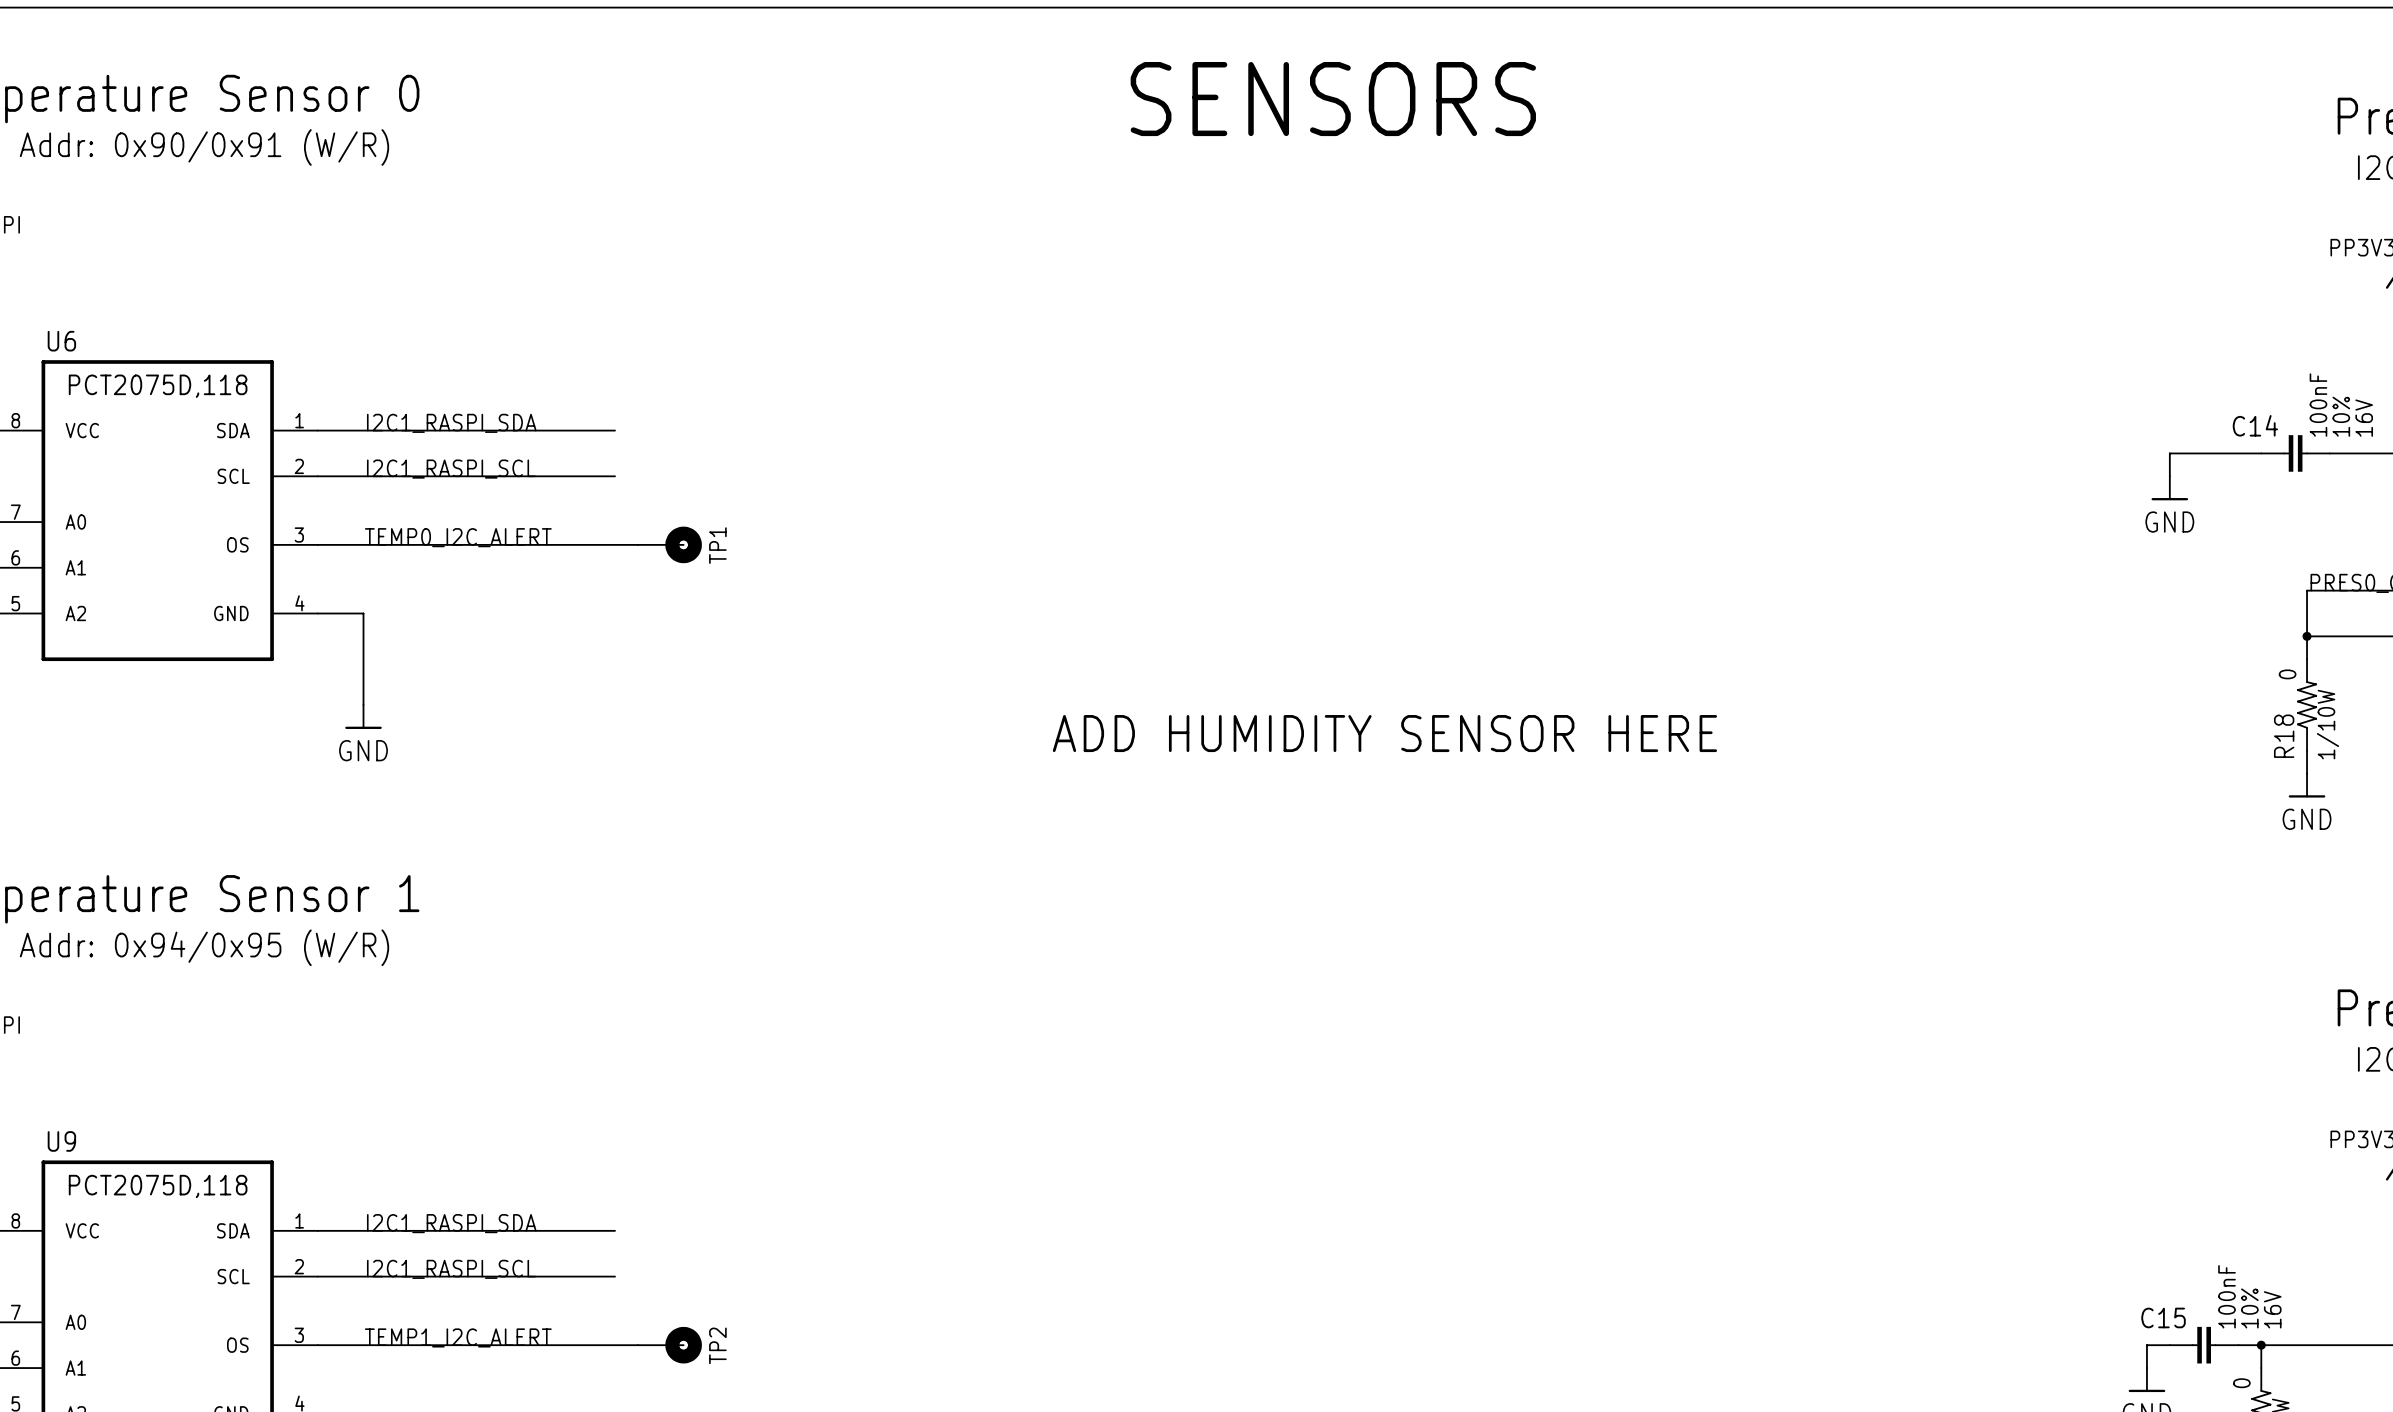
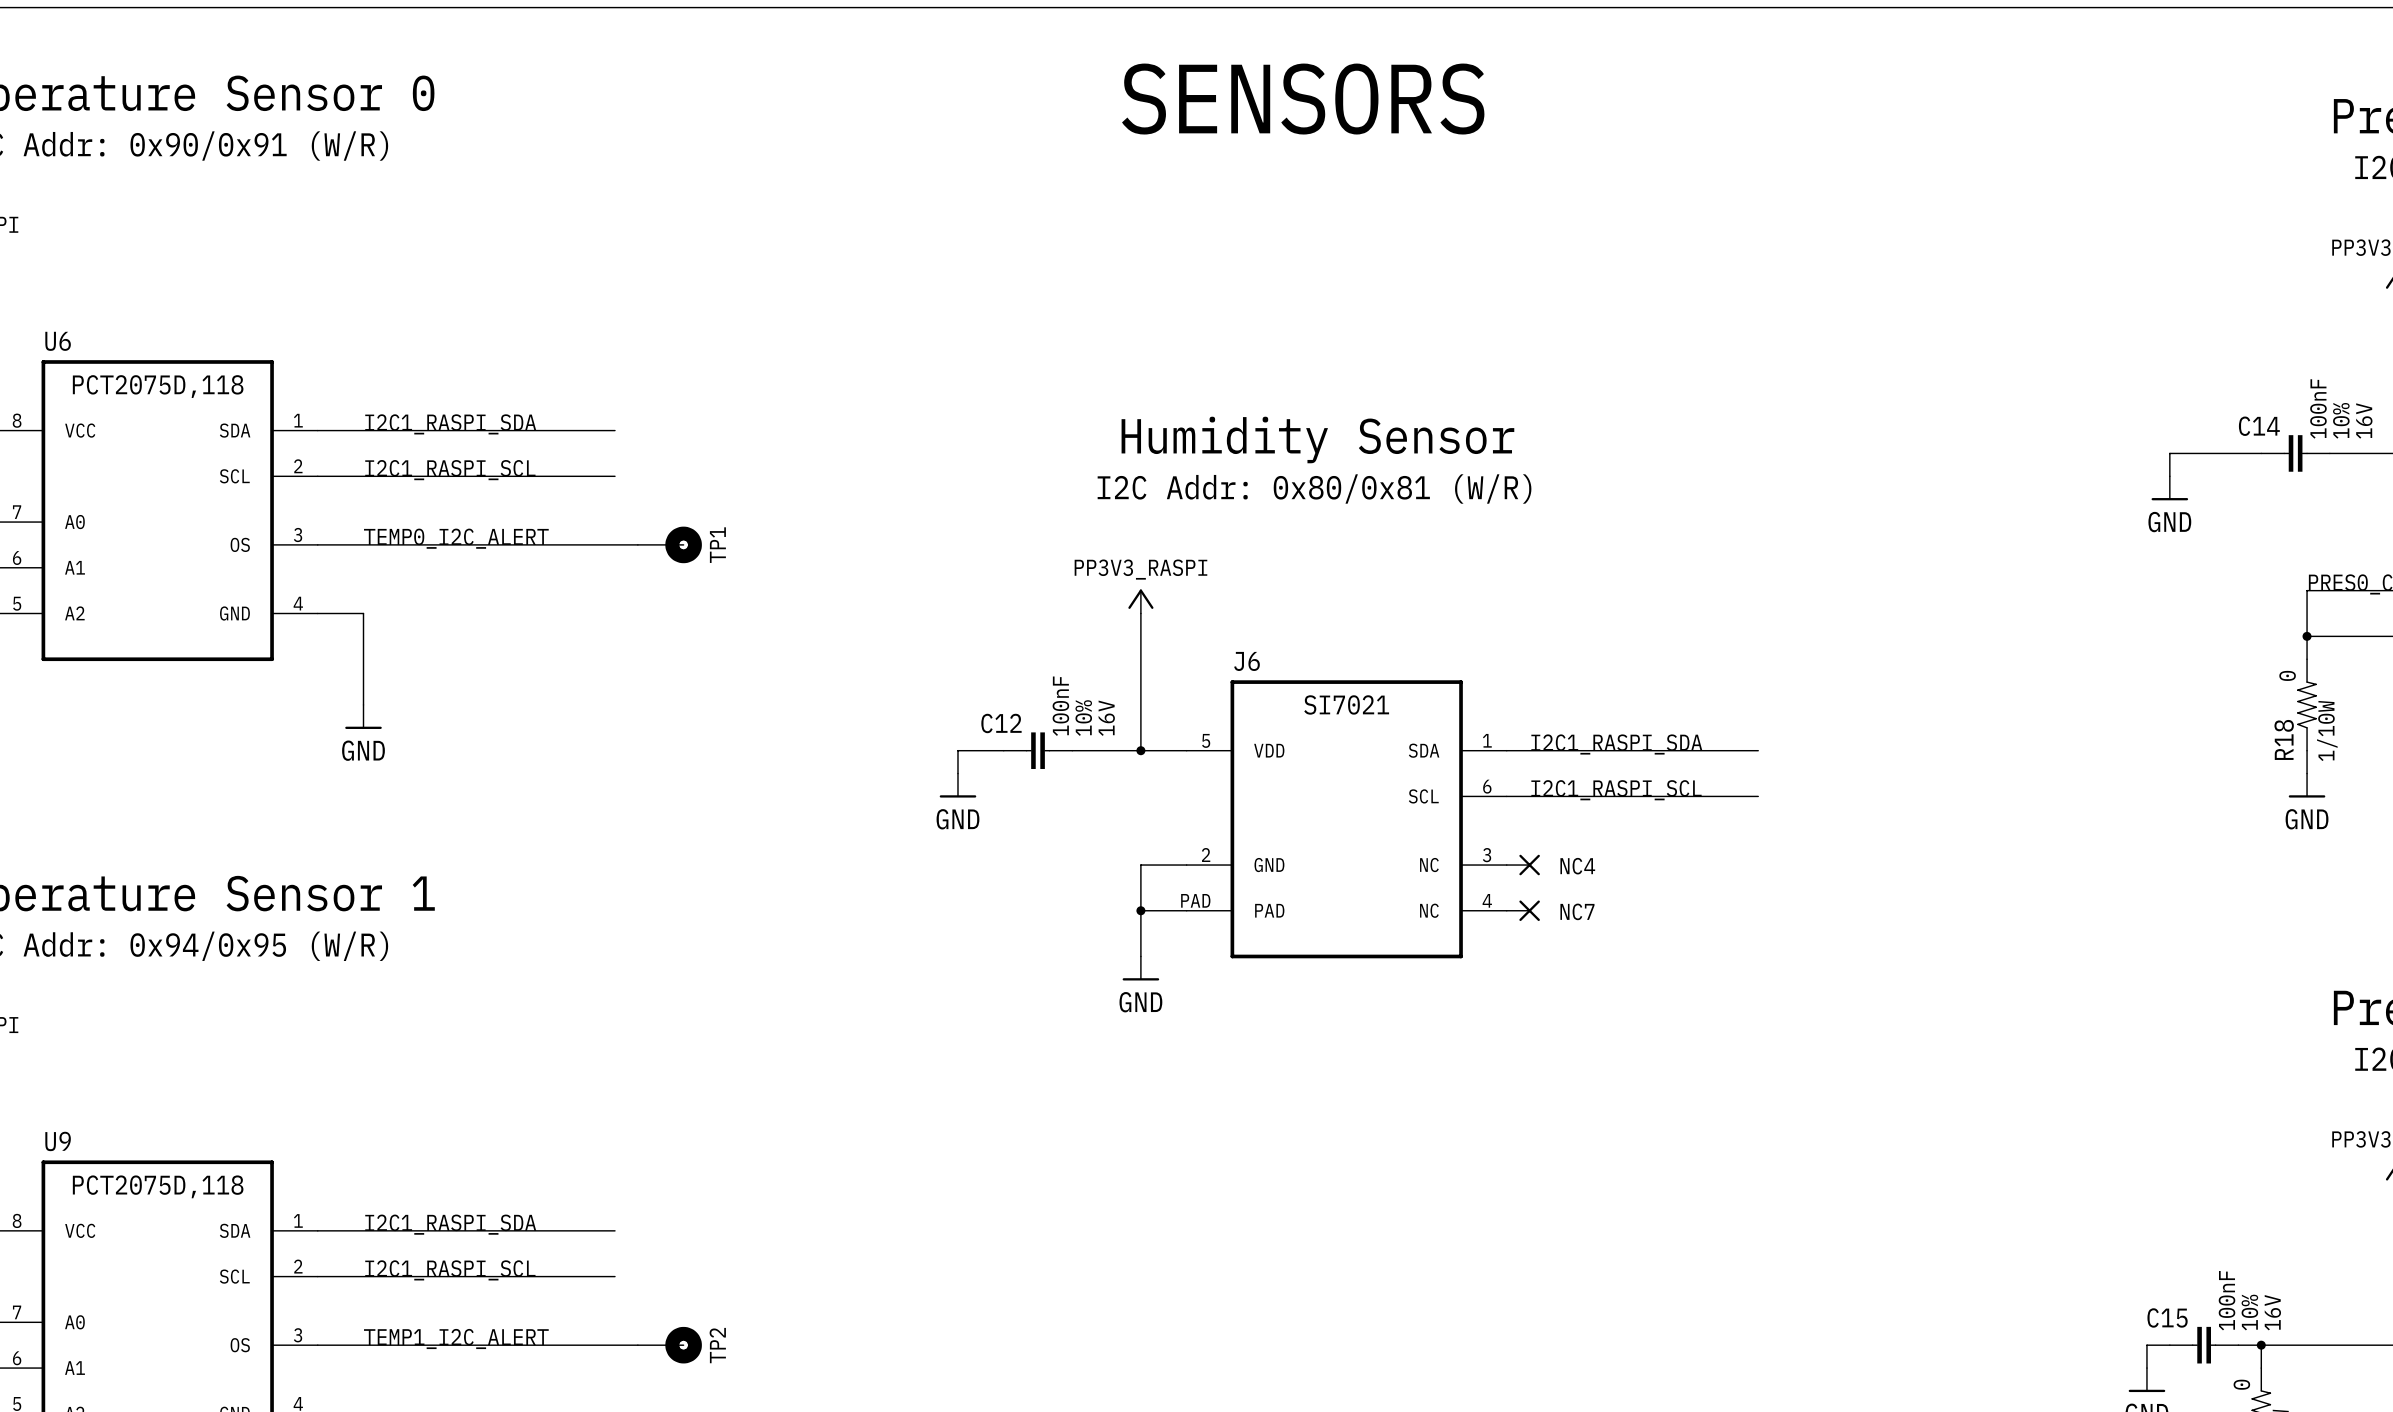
text: none -> Humidity Sensor (1317, 439)
text: none -> I2C Addr: 0x80/0x81 (W/R) (1314, 488)
power symbol: none -> PP3V3_RASPI (1140, 601)
wire: none -> (1140, 613) (1140, 750)
text: ADD HUMIDITY SENSOR HERE (1384, 733) -> none
label: none -> I2C1_RASPI_SDA (1616, 744)
wire: none -> (1003, 750) (957, 750) (957, 773)
C12: none -> 100nF (1038, 750)
wire: none -> (1072, 750) (1186, 750)
junction: none -> (1140, 750)
wire: none -> (1506, 750) (1758, 750)
power symbol: none -> GND (957, 785)
label: none -> I2C1_RASPI_SCL (1616, 790)
wire: none -> (1506, 796) (1758, 796)
J6: none -> SI7021 (1346, 819)
wire: none -> (1186, 865) (1140, 865) (1140, 956)
wire: none -> (1506, 865) (1529, 865)
NC4: none -> (1529, 865)
wire: none -> (1140, 910) (1186, 910)
junction: none -> (1140, 910)
wire: none -> (1506, 910) (1529, 910)
NC7: none -> (1529, 910)
power symbol: none -> GND (1140, 968)

